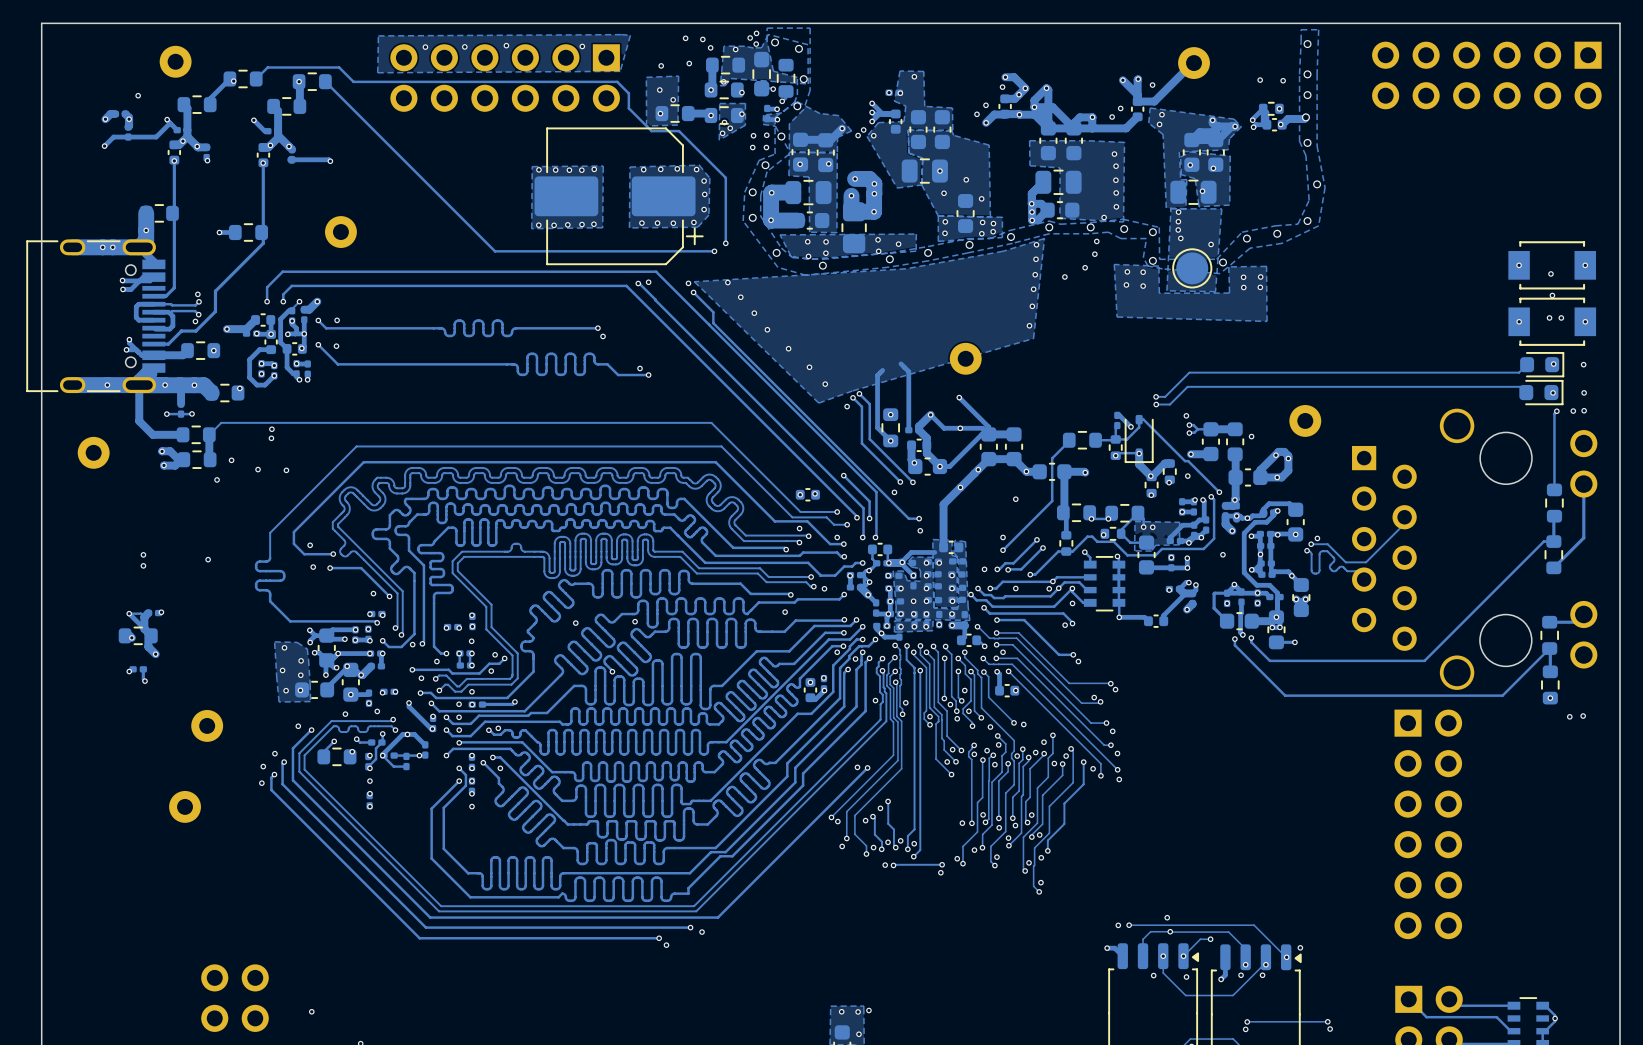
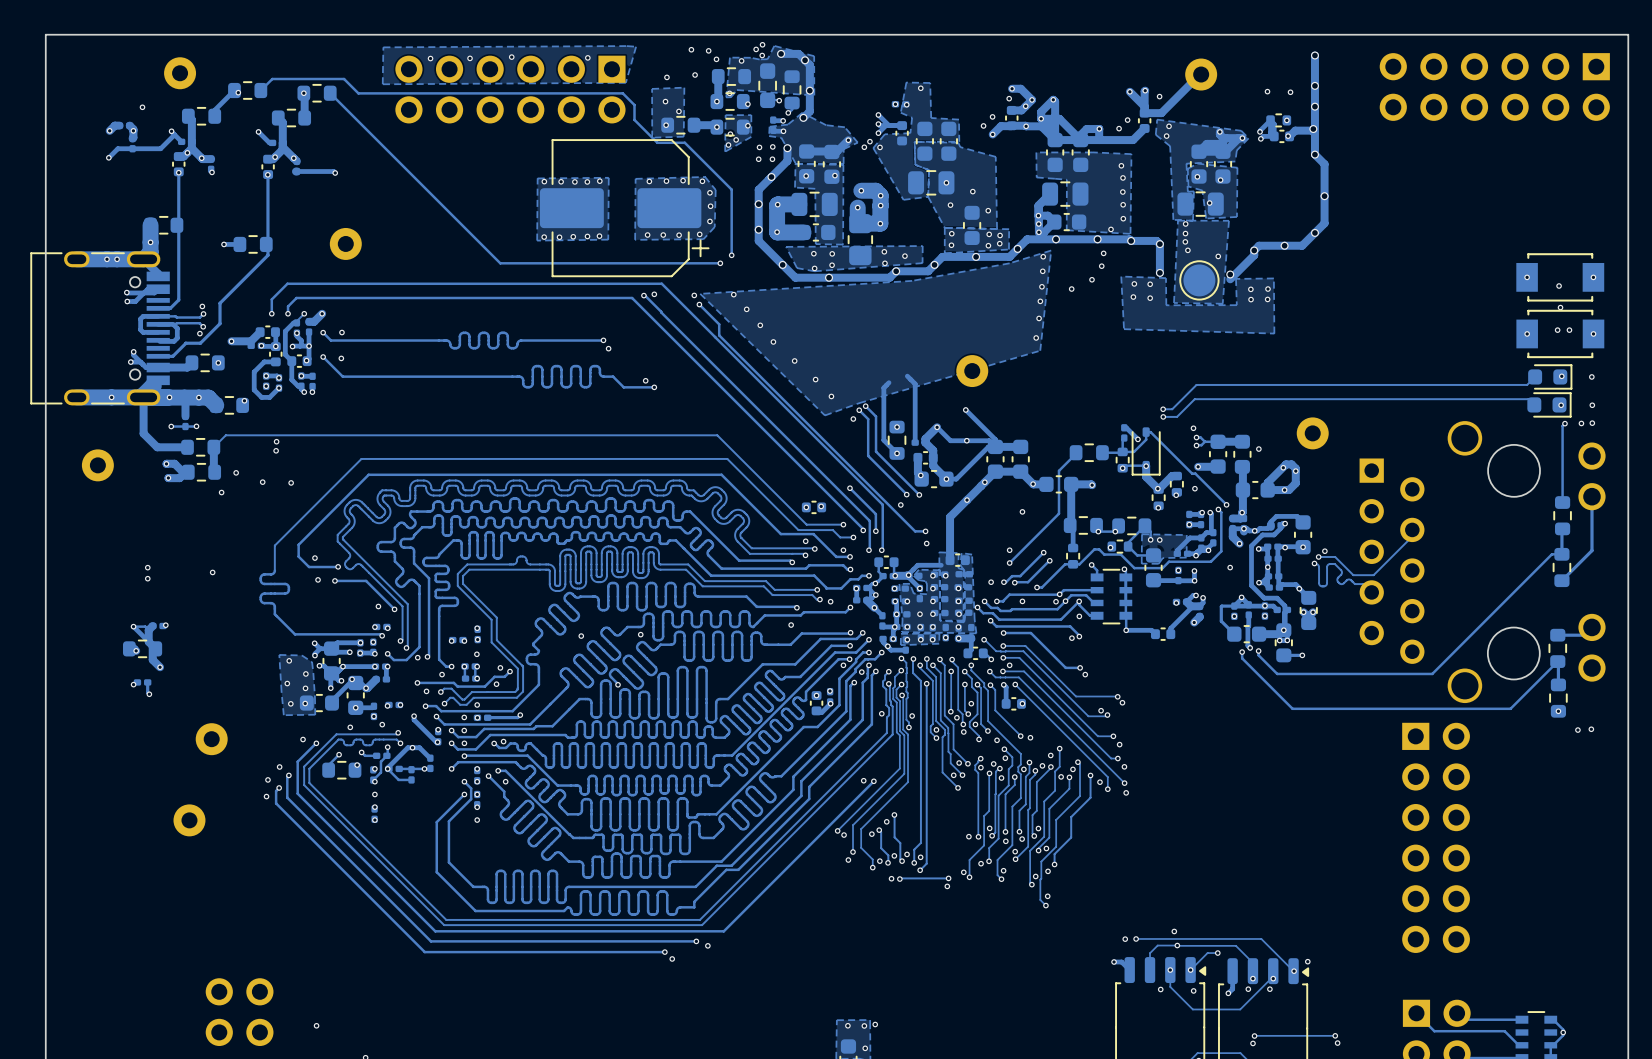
zone outline: (810, 28) (767, 28) (767, 40) (773, 71) (797, 77) (797, 95) (794, 103) (775, 117) (775, 154) (759, 160) (744, 192) (743, 221) (777, 267) (806, 275) (888, 267) (967, 252) (1049, 233) (1108, 232) (1121, 238) (1146, 238) (1143, 257) (1148, 266) (1219, 273) (1250, 248) (1282, 243) (1318, 225) (1325, 187) (1317, 146) (1318, 29) (1301, 29) (1299, 141) (1305, 155) (1309, 200) (1297, 224) (1275, 225) (1242, 232) (1216, 259) (1159, 259) (1159, 227) (1123, 219) (1060, 224) (1049, 221) (1009, 230) (990, 238) (967, 238) (889, 252) (822, 259) (792, 257) (781, 248) (760, 216) (760, 195) (767, 171) (789, 154) (789, 123) (803, 109) (810, 90) (810, 28) -> none
track: none -> (781, 53) (798, 53) (809, 65) (809, 111) (803, 117)
track: none -> (1314, 55) (1314, 154) (1324, 164) (1324, 223) (1302, 245) (1259, 245) (1254, 250) (1254, 255) (1230, 279)
track: none -> (787, 148) (787, 161) (758, 189) (758, 240) (795, 277) (889, 277) (896, 271) (928, 271) (942, 256) (1009, 256) (1027, 239) (1156, 240) (1159, 244) (1159, 272)

